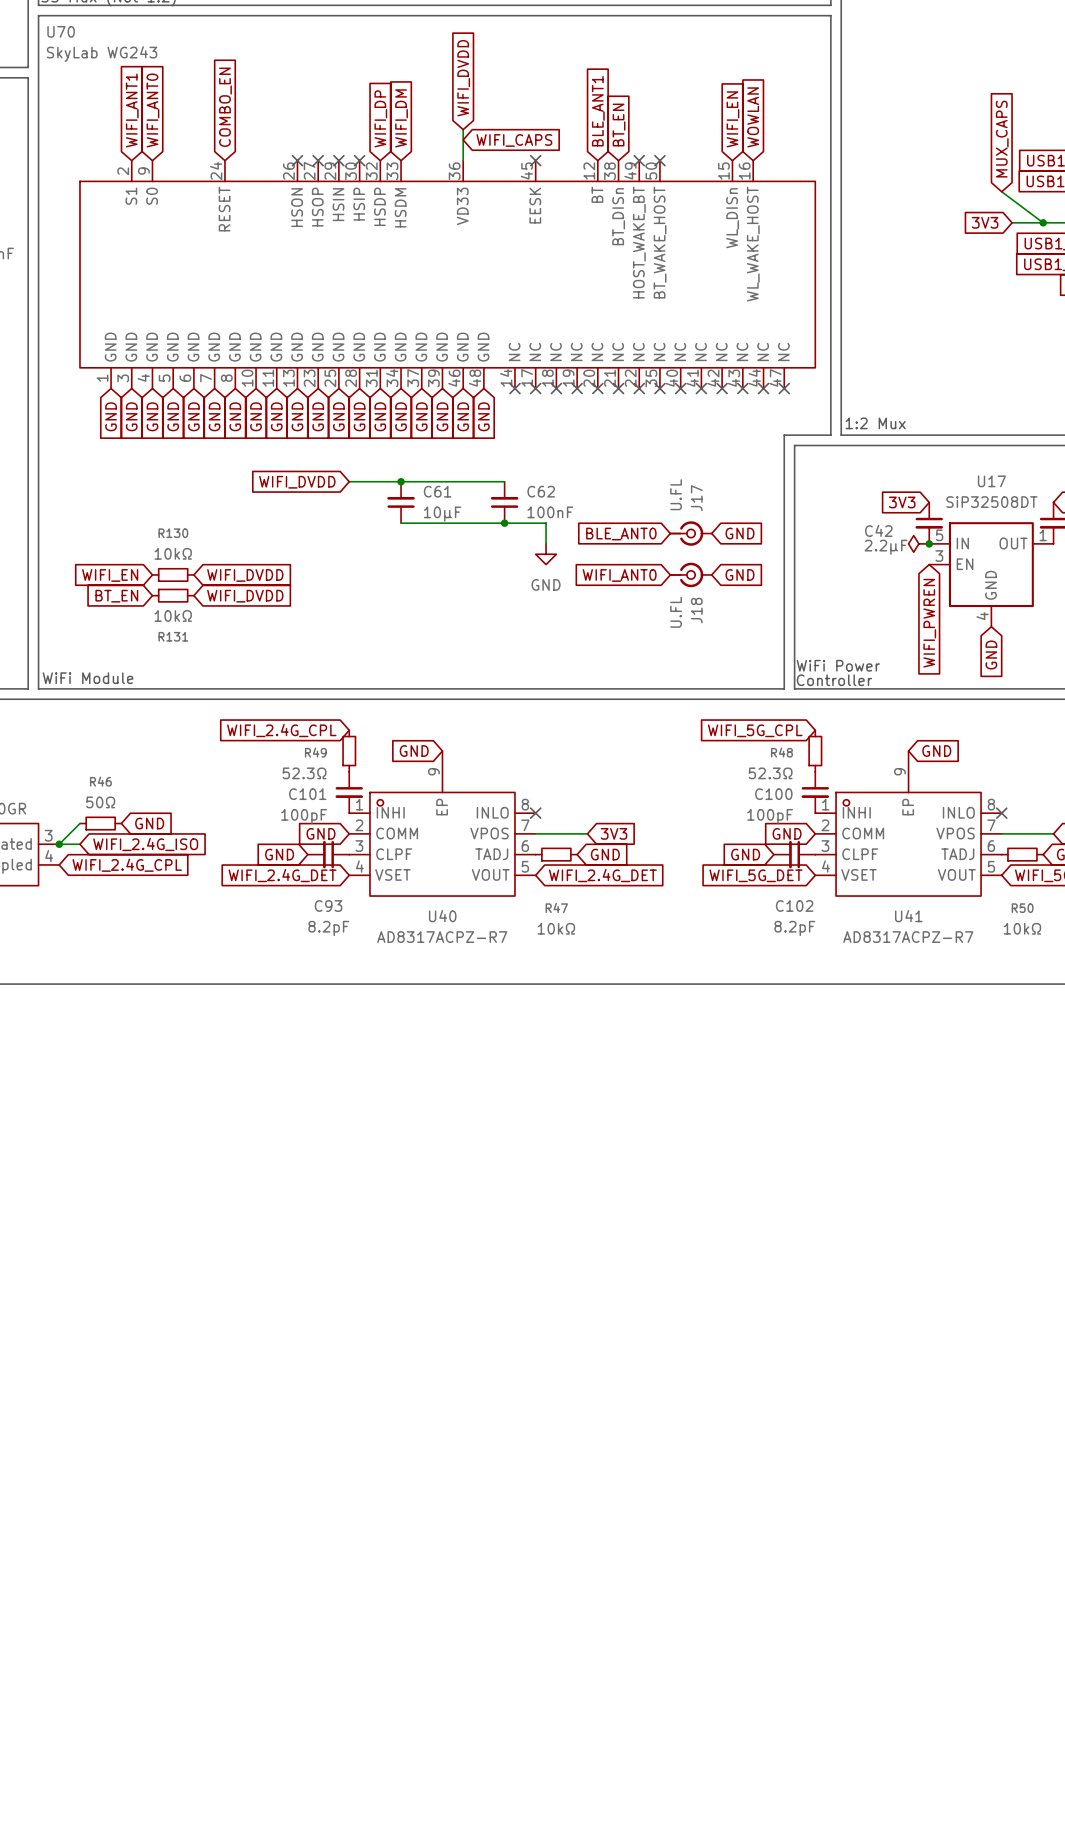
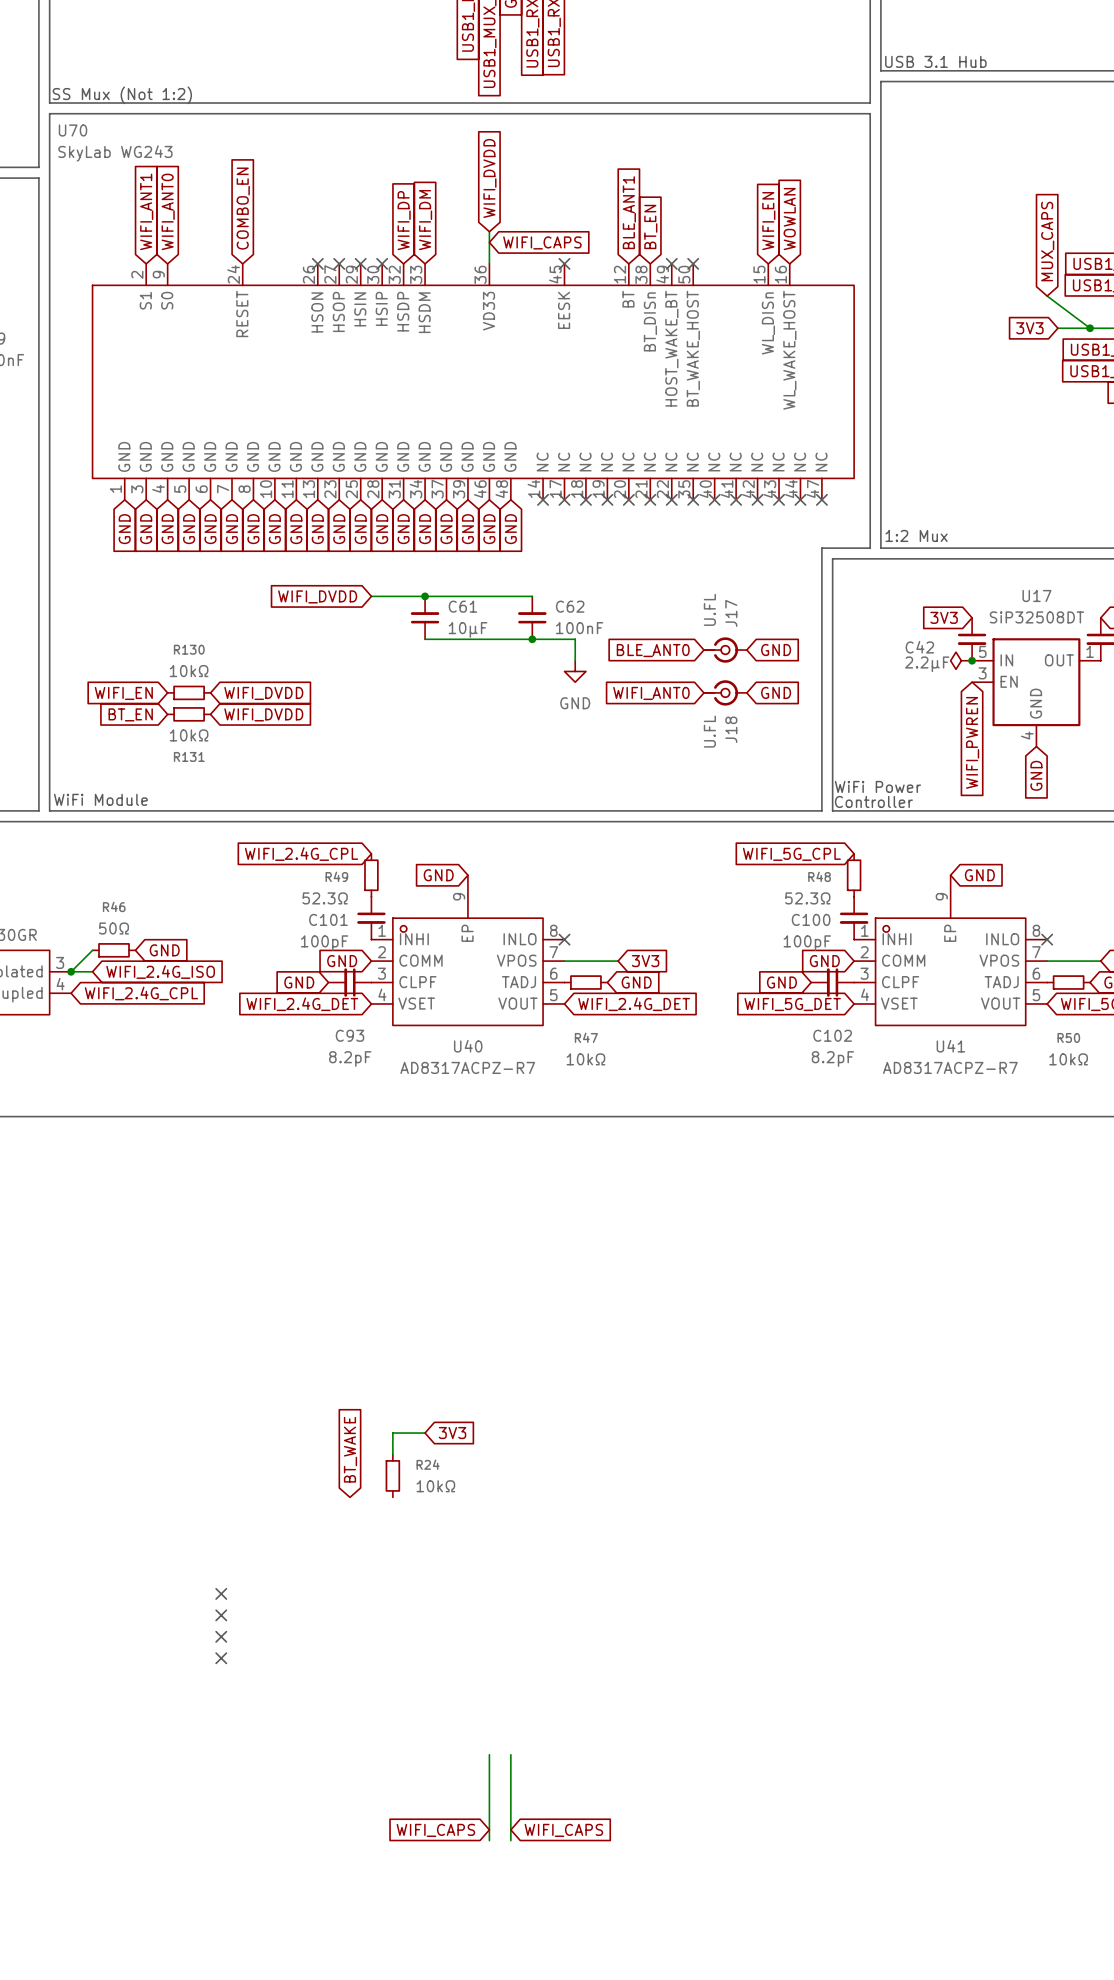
wire: none -> (425, 1433) (392, 1433) (392, 1454)
global label: none -> 3V3 (452, 1433)
global label: none -> BT_WAKE (350, 1449)
R24: none -> 10kΩ (392, 1475)
no-connect mark: none -> (221, 1593)
no-connect mark: none -> (221, 1615)
no-connect mark: none -> (221, 1636)
no-connect mark: none -> (221, 1658)
wire: none -> (489, 1754) (489, 1840)
wire: none -> (510, 1754) (510, 1840)
global label: none -> WIFI_CAPS (435, 1830)
global label: none -> WIFI_CAPS (563, 1830)

